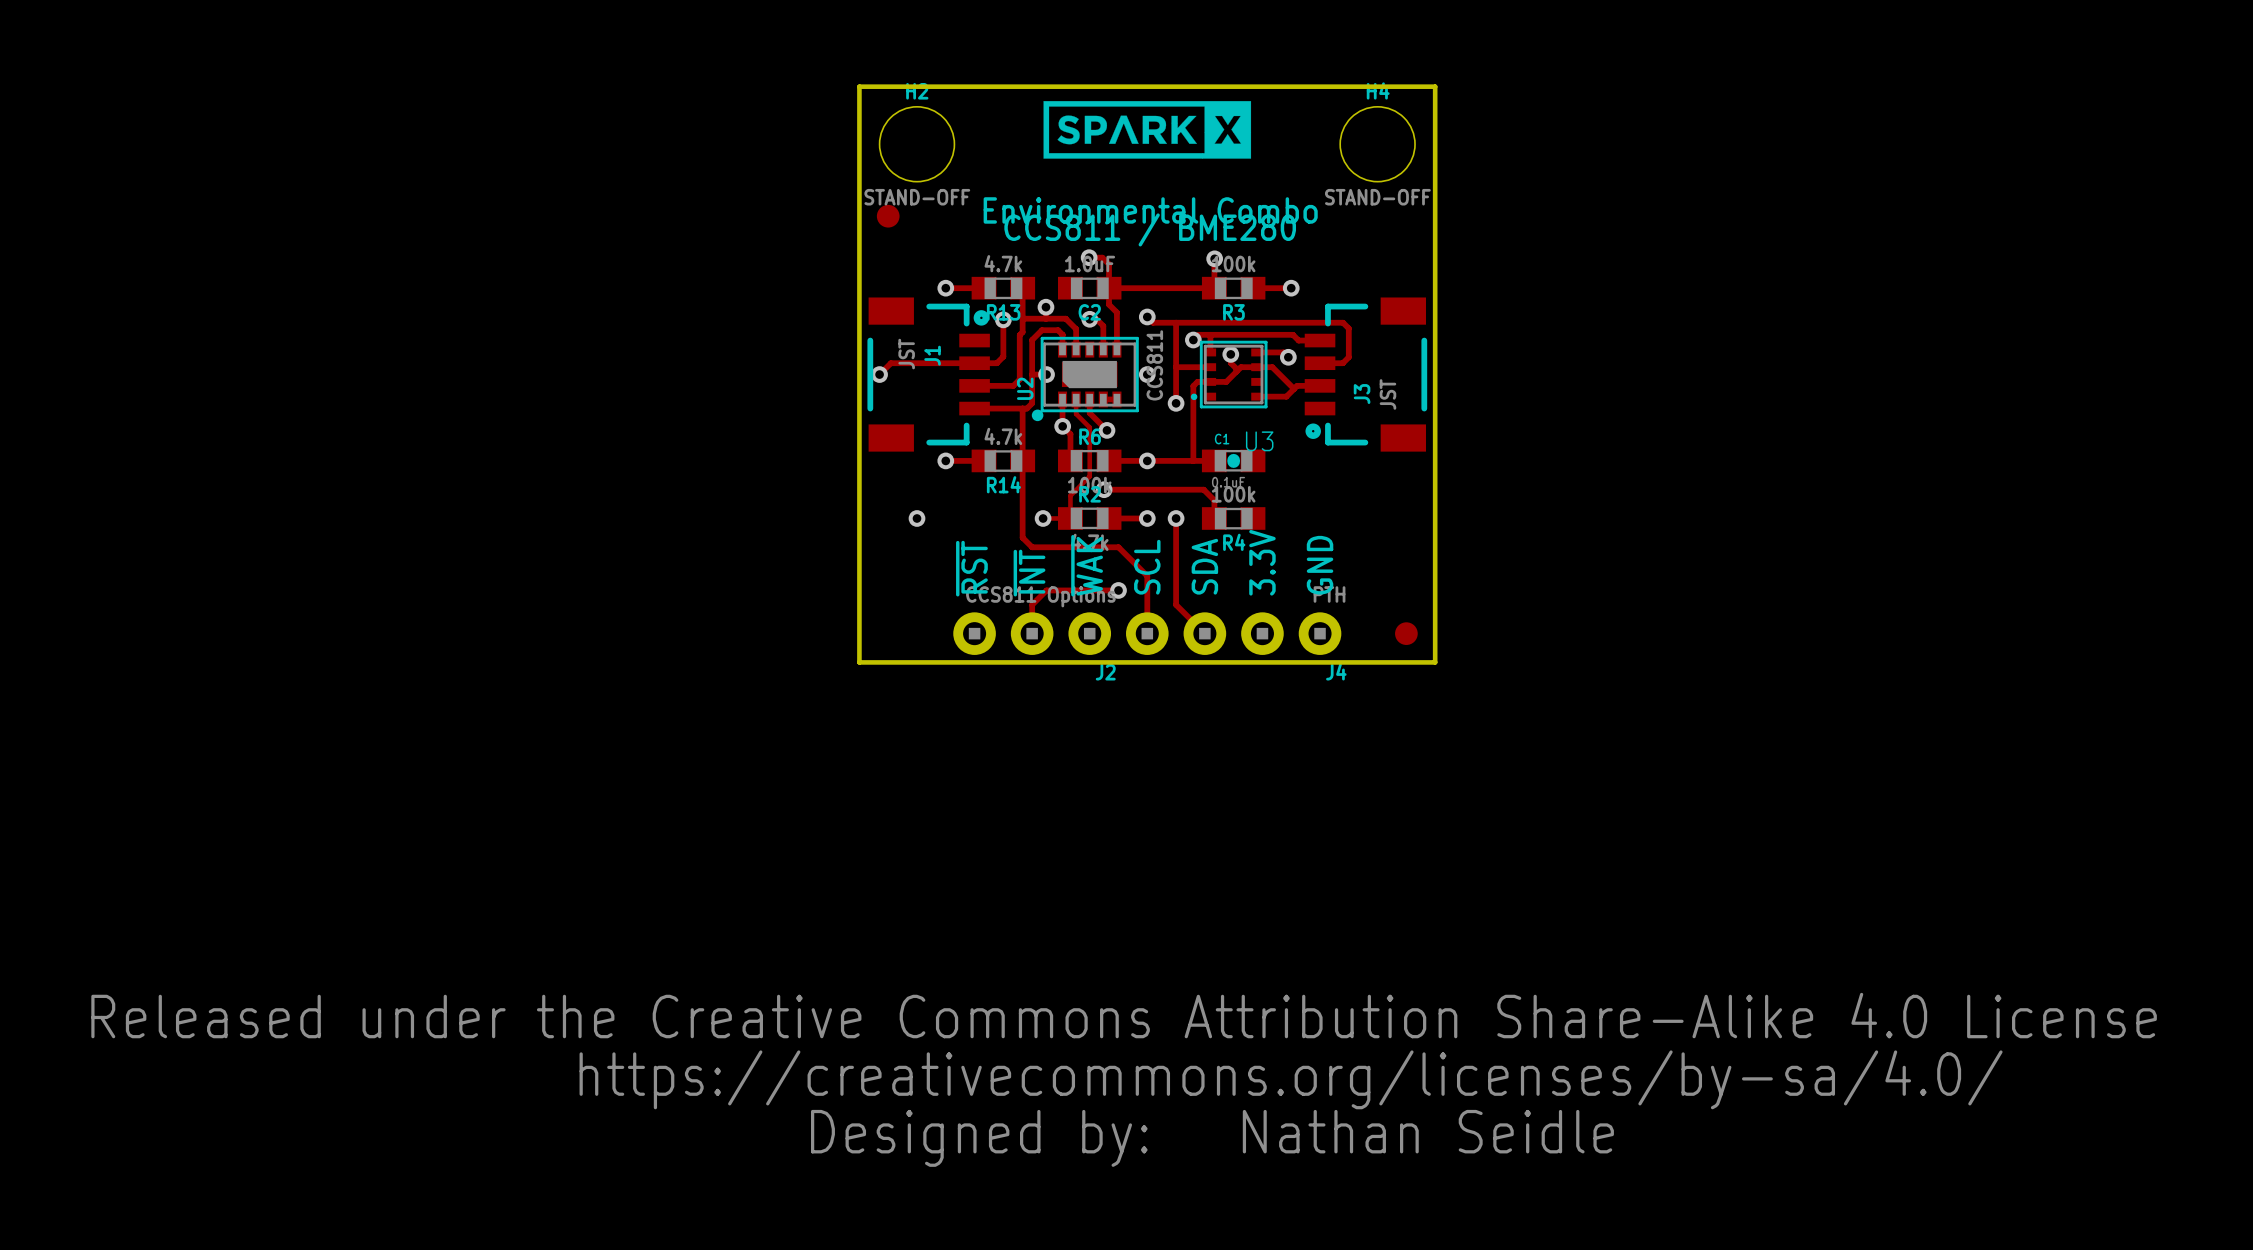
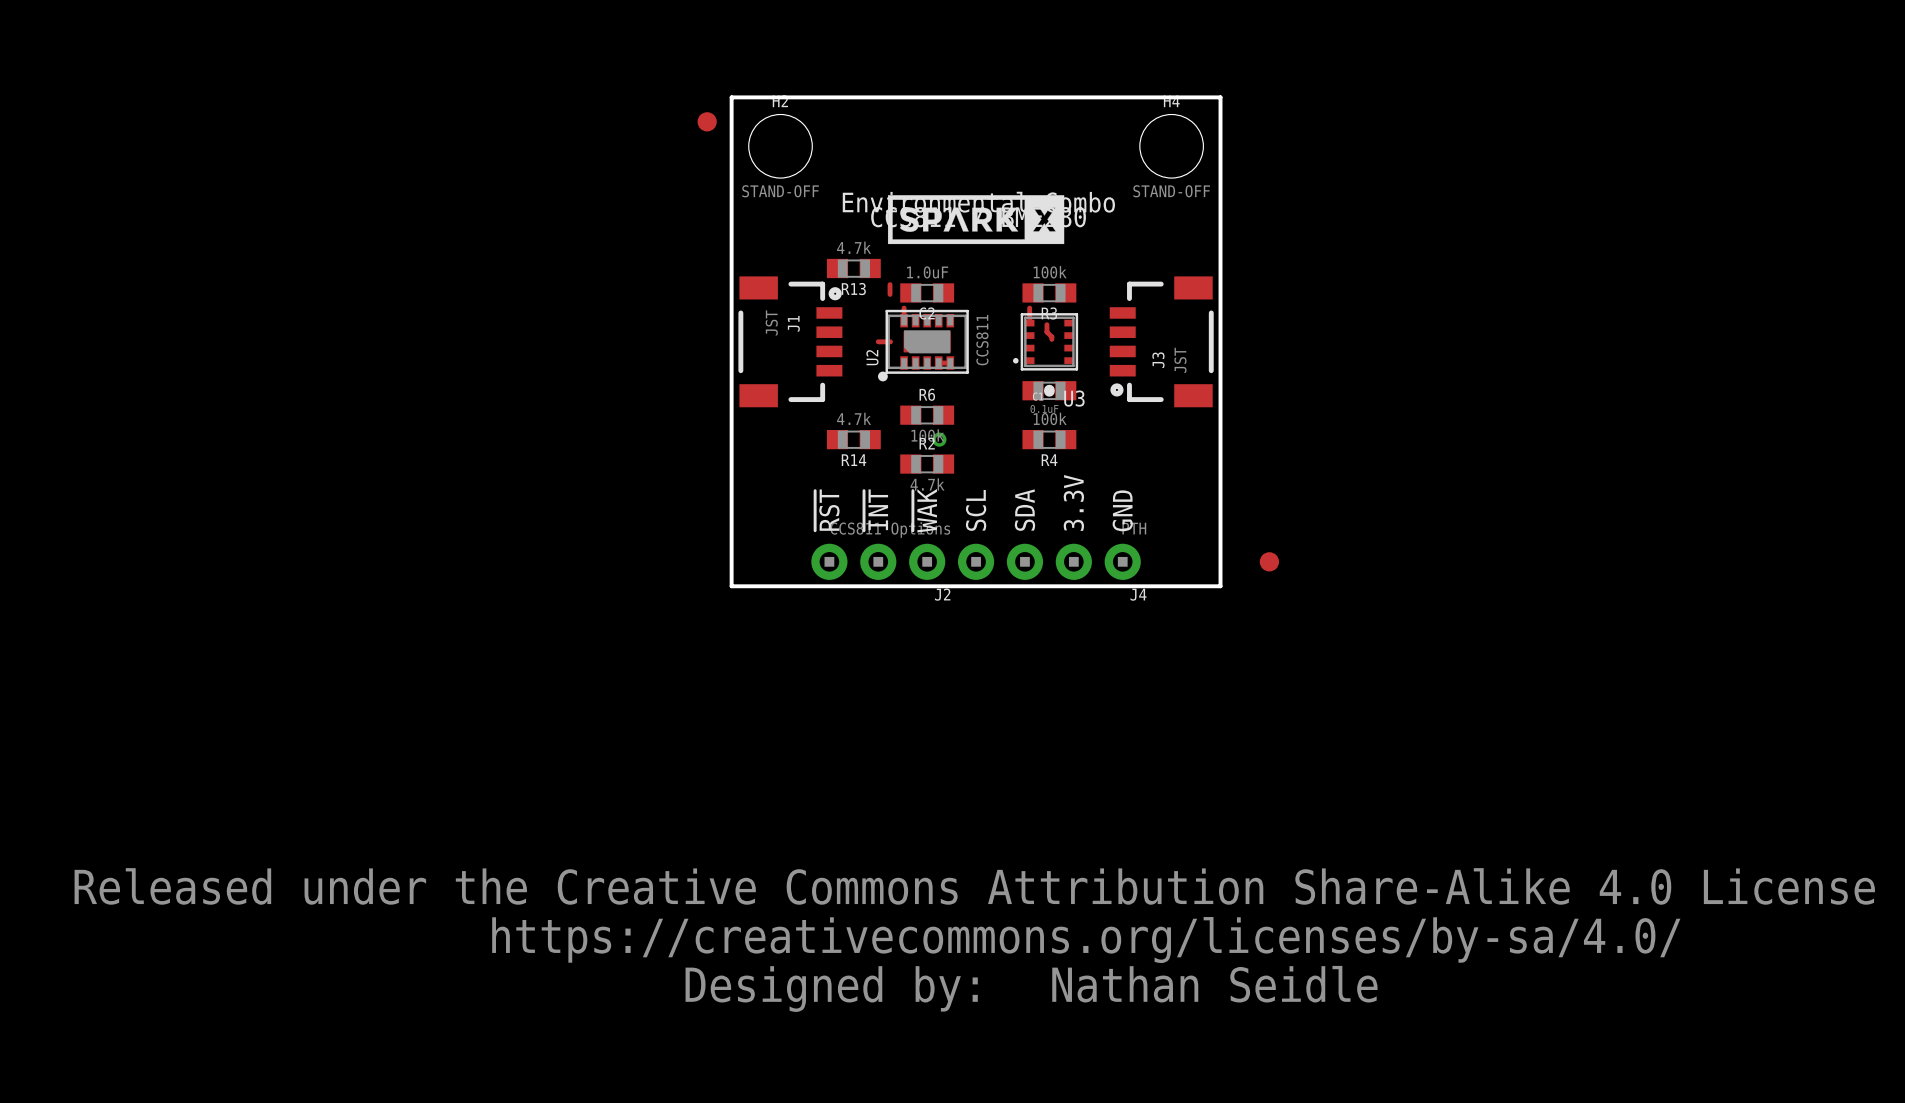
drawing position: (1147, 129) -> (976, 219)
part position: (888, 216) -> (707, 121)
track: (1089, 257) (1102, 257) (1108, 264) (1108, 304) (1116, 312) (1116, 349) -> none
via: (1089, 257) -> none
via: (1214, 258) -> none
track: (1214, 259) (1214, 288) (1108, 288) -> none
track: (945, 288) (984, 288) -> none
via: (945, 288) -> none
track: (1022, 288) (1019, 379) (1013, 385) (974, 385) -> none
C2 position: (1089, 288) -> (927, 292)
R3 position: (1233, 288) -> (1049, 292)
track: (1252, 288) (1291, 288) -> none
via: (1291, 288) -> none
via: (1045, 307) -> none
track: (1147, 316) (1153, 322) (1343, 322) (1348, 328) (1348, 357) (1342, 363) (1320, 363) -> none
via: (1147, 316) -> none
track: (1022, 318) (1065, 318) (1076, 329) (1076, 349) -> none
track: (1003, 319) (1003, 356) (996, 363) (890, 363) (879, 374) -> none
via: (1003, 319) -> none
track: (1089, 319) (1096, 319) (1103, 325) (1103, 349) -> none
via: (1089, 319) -> none
track: (1176, 322) (1176, 403) -> none
track: (1062, 334) (1058, 330) (1041, 330) (1032, 340) (1032, 403) (1026, 408) (974, 408) -> none
track: (1193, 340) (1198, 334) (1292, 334) (1298, 340) (1320, 340) -> none
via: (1193, 340) -> none
track: (1256, 352) (1283, 352) (1288, 357) -> none
via: (1230, 354) -> none
via: (1288, 357) -> none
track: (1176, 367) (1210, 367) -> none
via: (879, 374) -> none
via: (1046, 374) -> none
via: (1147, 374) -> none
track: (1320, 385) (1297, 385) (1286, 396) (1256, 396) -> none
track: (1294, 388) (1272, 367) (1241, 367) (1226, 381) (1197, 381) (1193, 386) (1193, 460) -> none
track: (1062, 399) (1062, 426) (1070, 434) (1070, 460) -> none
track: (1076, 399) (1076, 413) (1089, 427) (1089, 476) (1070, 495) (1070, 518) (1043, 518) -> none
track: (1089, 399) (1089, 413) (1107, 430) -> none
via: (1176, 403) -> none
track: (1022, 408) (1022, 537) (1032, 547) (1118, 547) (1147, 576) (1147, 633) -> none
via: (1062, 426) -> none
via: (1107, 430) -> none
track: (945, 460) (984, 460) -> none
via: (945, 460) -> none
R14 position: (1003, 460) -> (853, 439)
track: (1108, 460) (1214, 460) -> none
via: (1147, 460) -> none
C1 position: (1233, 460) -> (1049, 390)
track: (1104, 489) (1203, 489) (1214, 500) (1214, 518) -> none
via: (917, 518) -> none
via: (1043, 518) -> none
track: (1108, 518) (1147, 518) -> none
via: (1147, 518) -> none
track: (1176, 518) (1176, 604) (1204, 633) -> none
via: (1176, 518) -> none
R4 position: (1233, 518) -> (1049, 439)
track: (1118, 590) (1046, 590) (1032, 604) (1032, 633) -> none
via: (1118, 590) -> none
part position: (1406, 633) -> (1269, 561)

